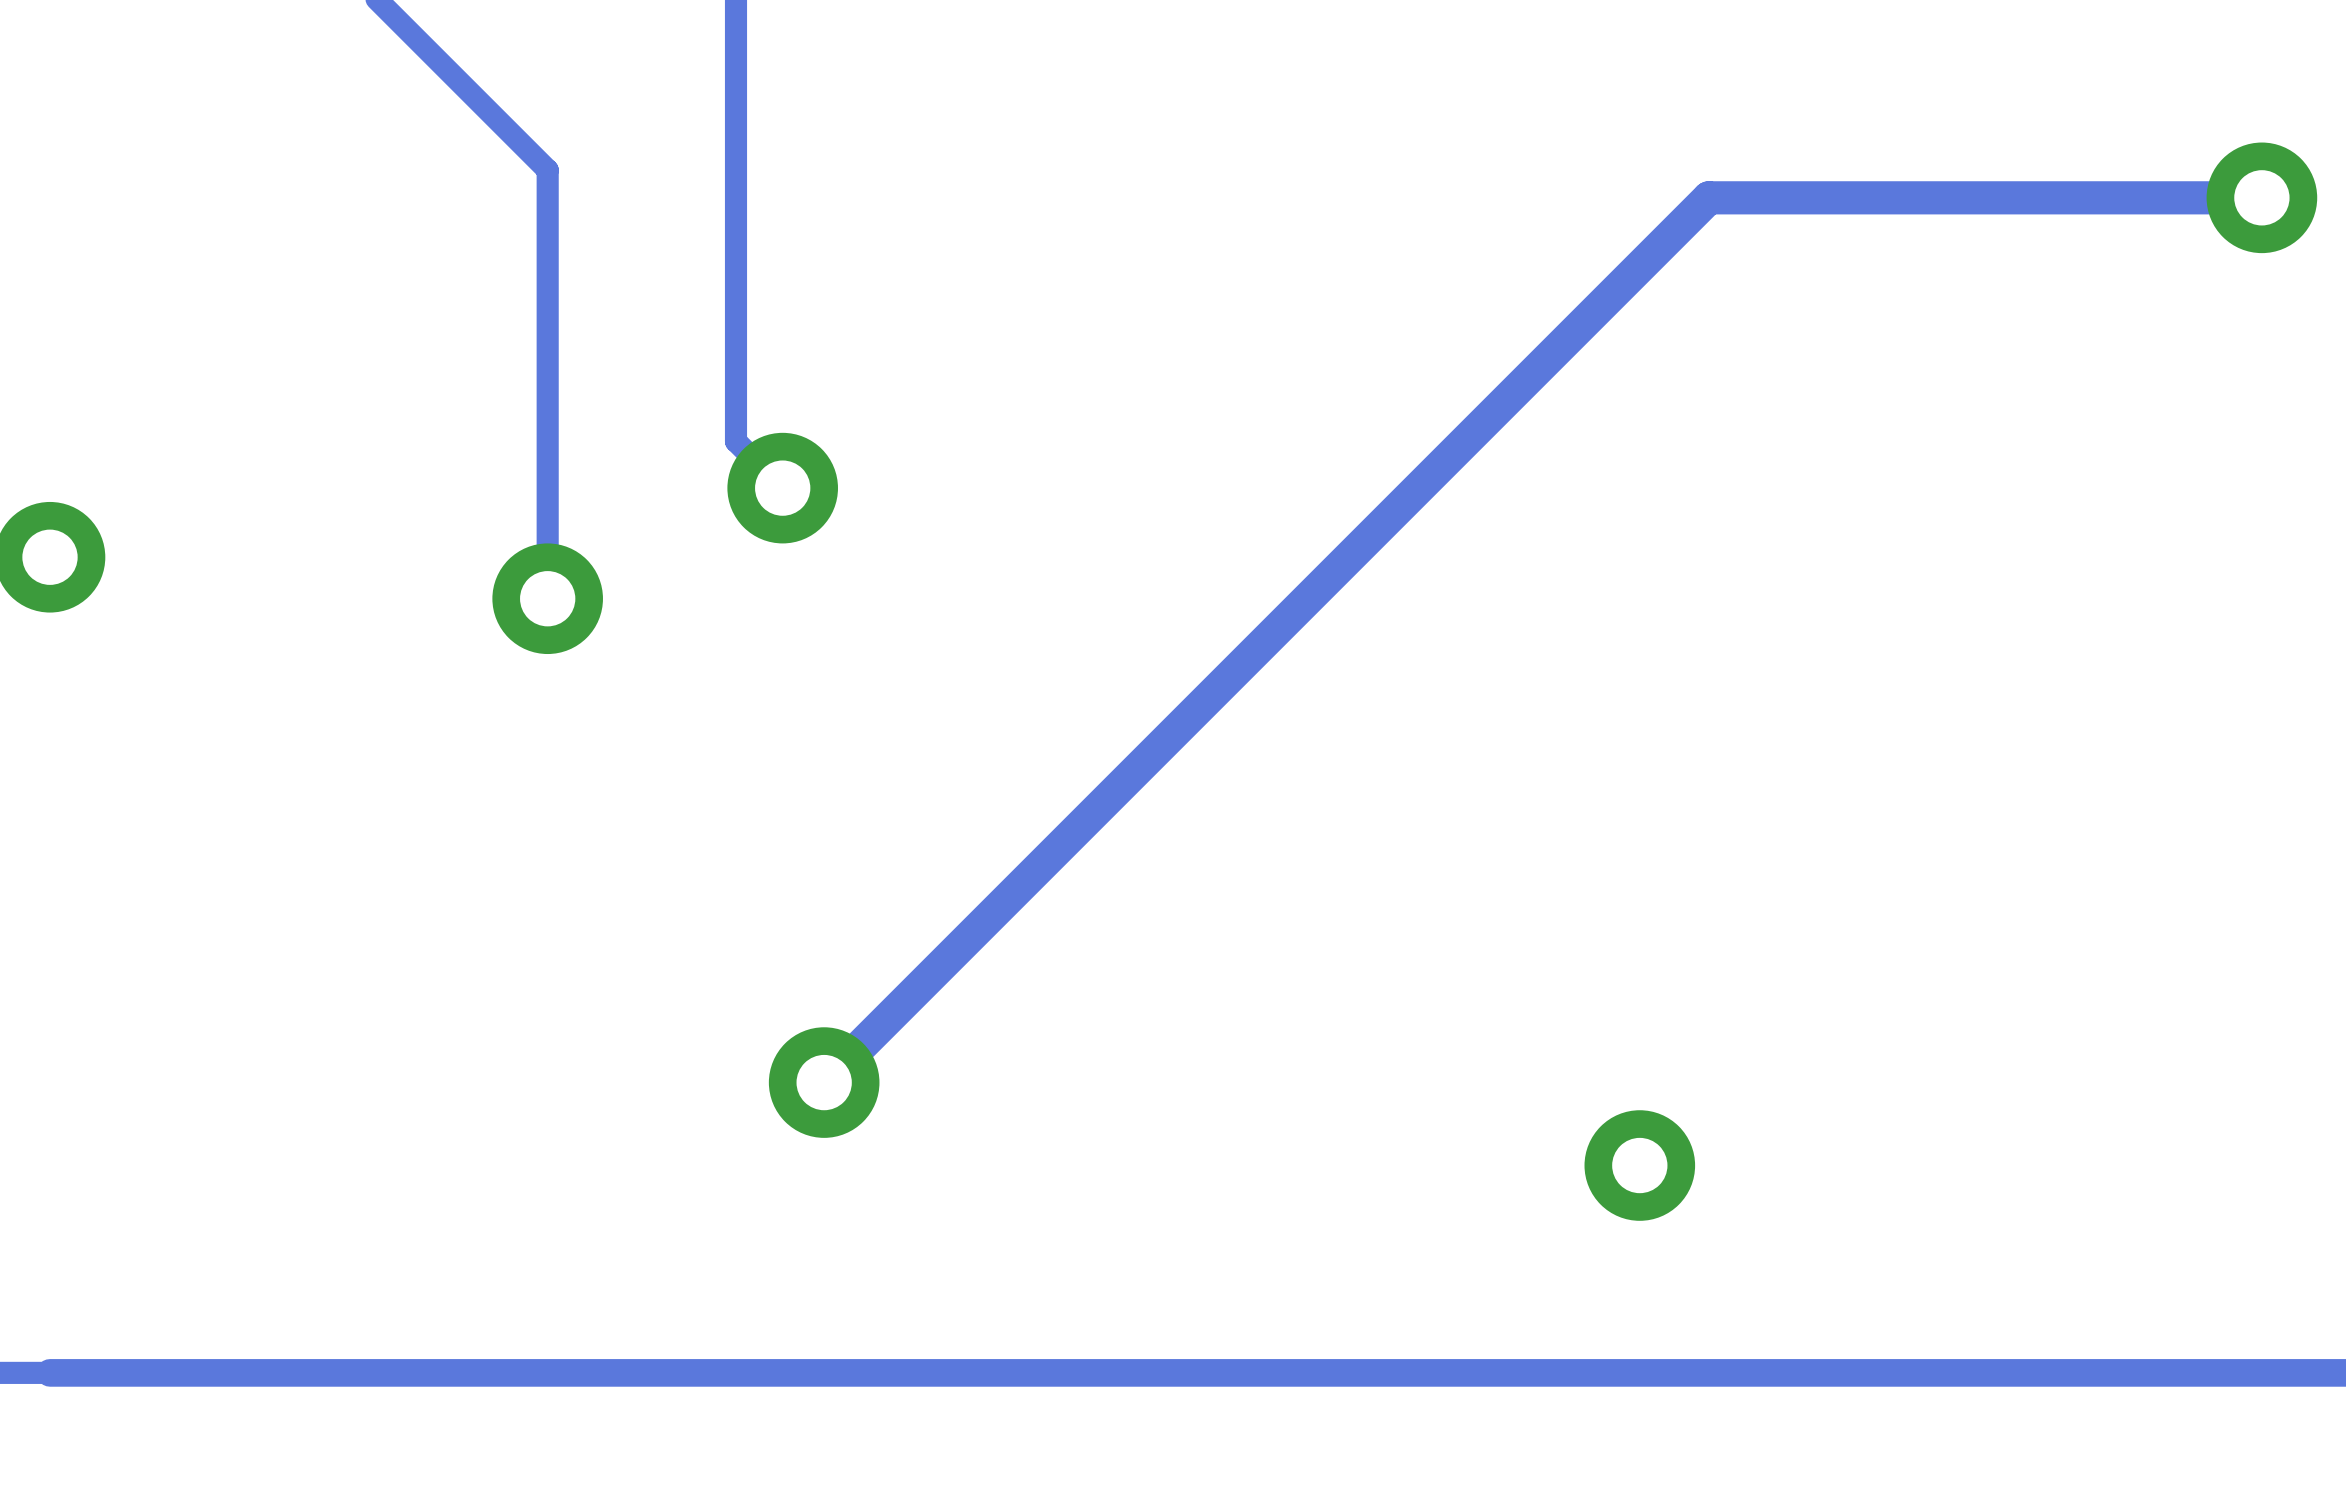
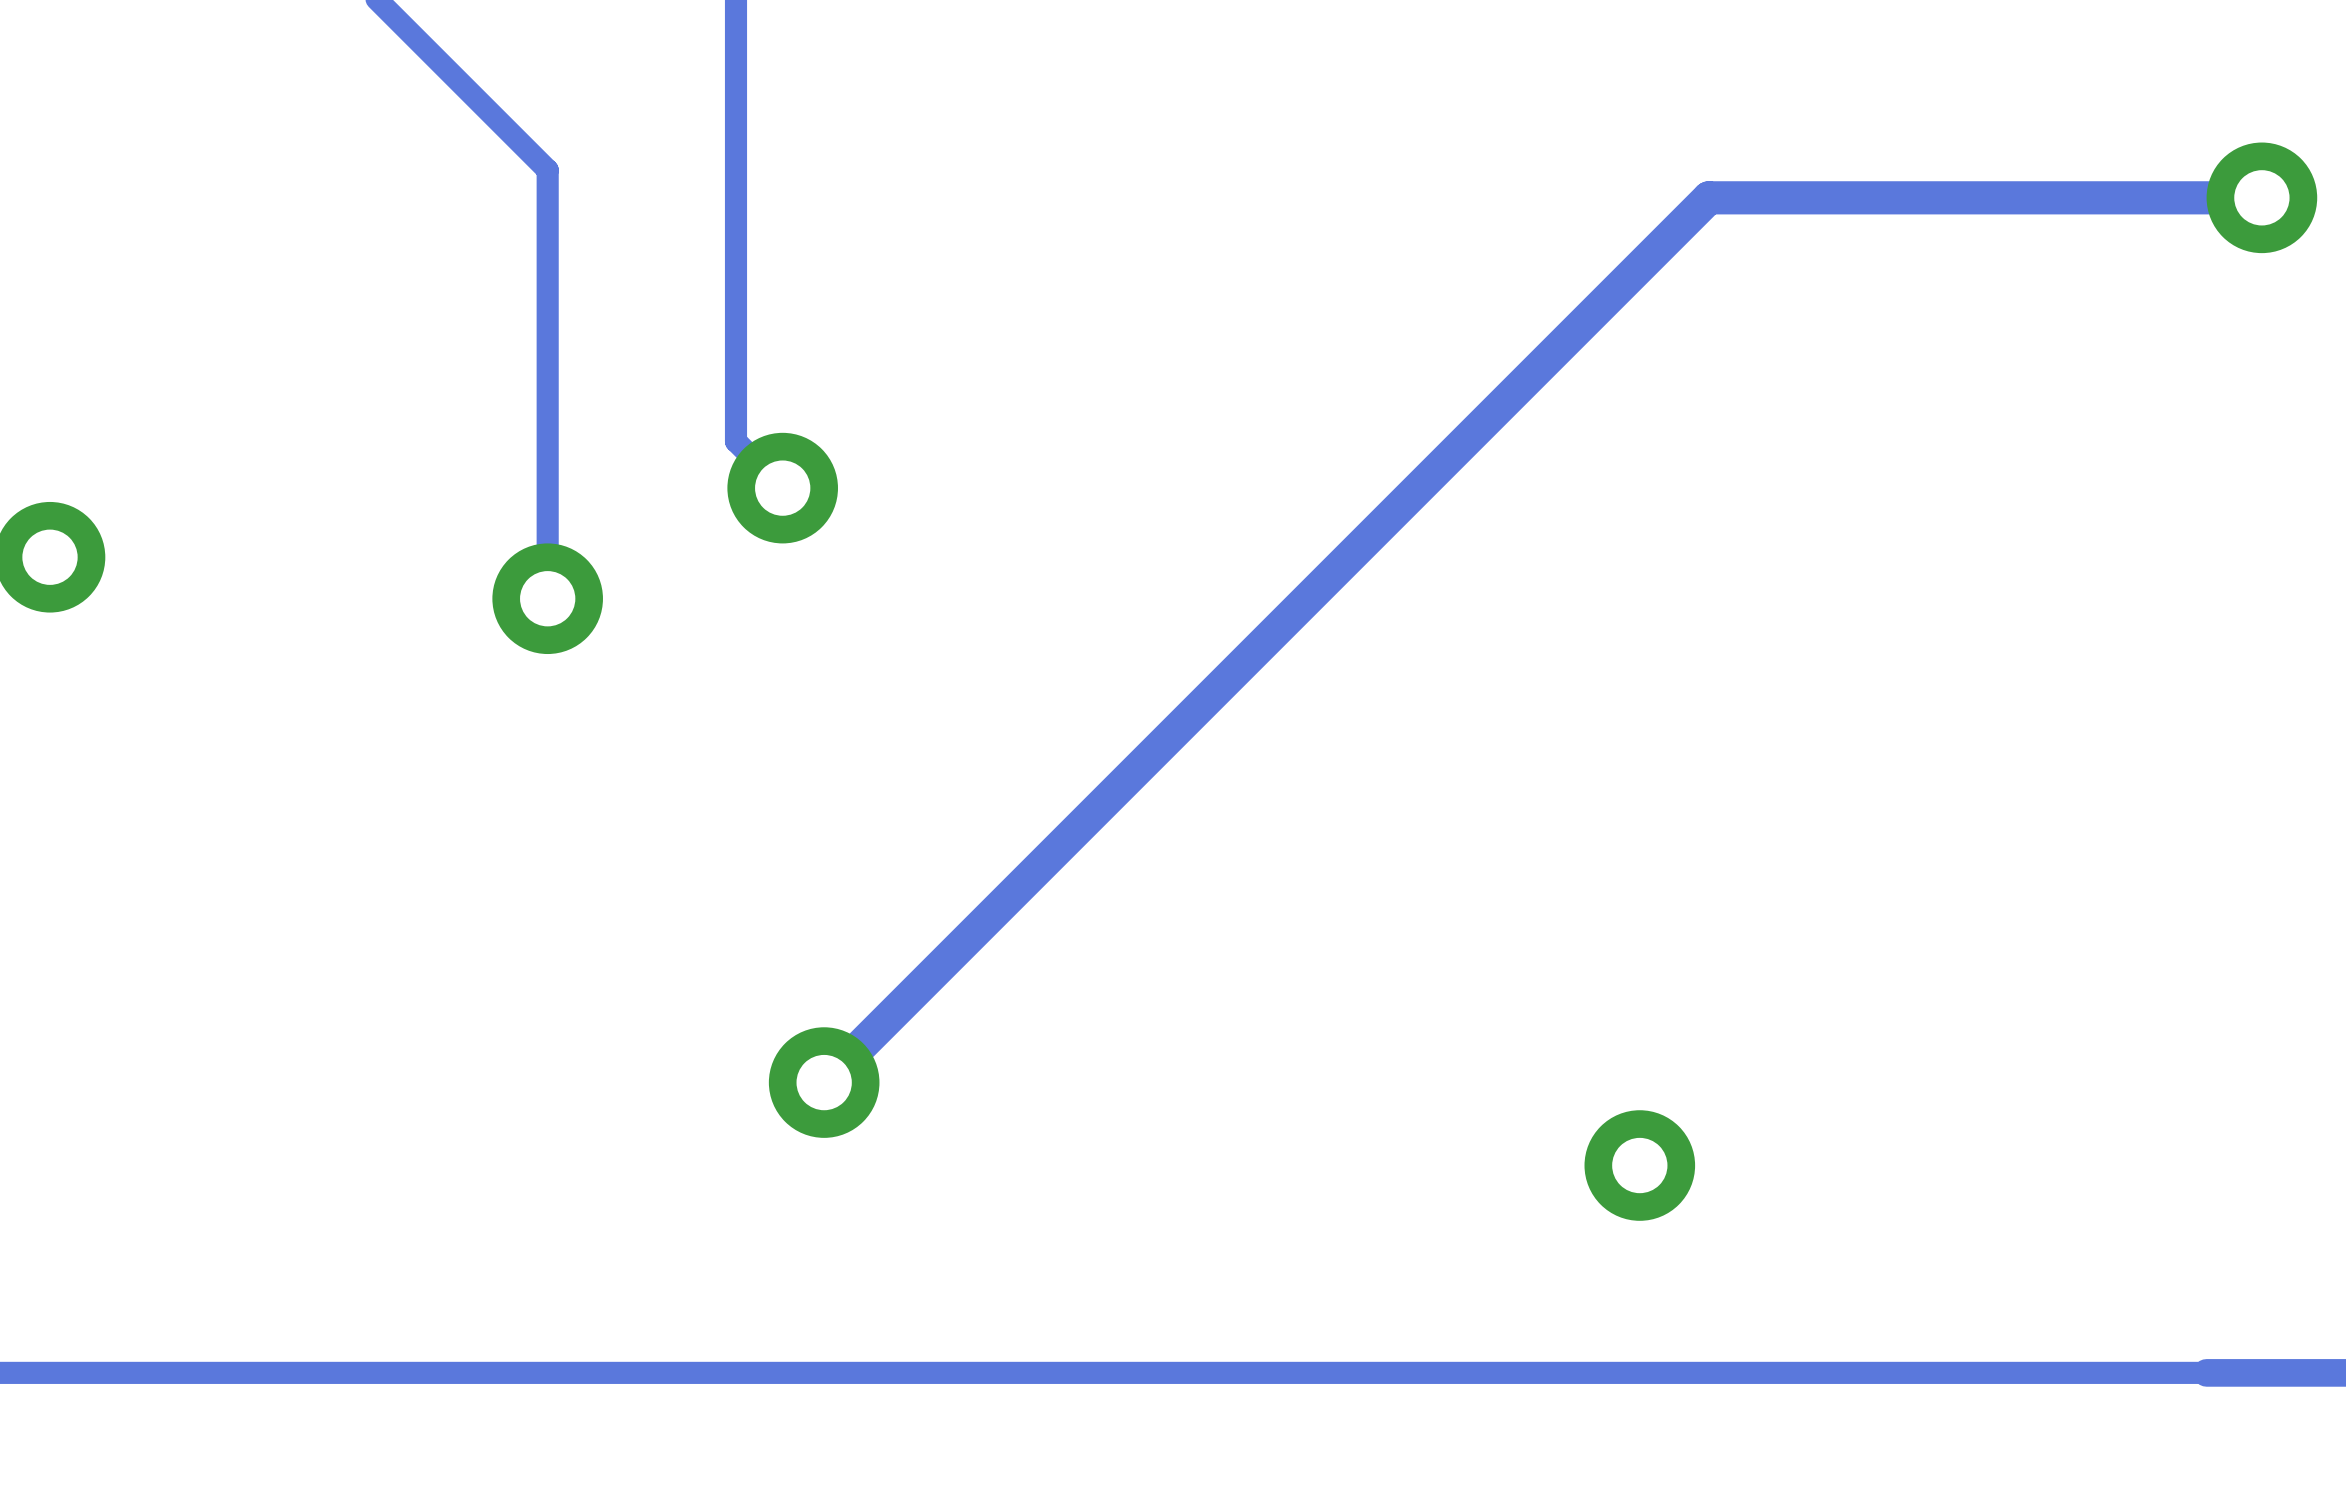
track width: thick (2206, 1372) (50, 1372) -> thin (2206, 1372) (50, 1372)

